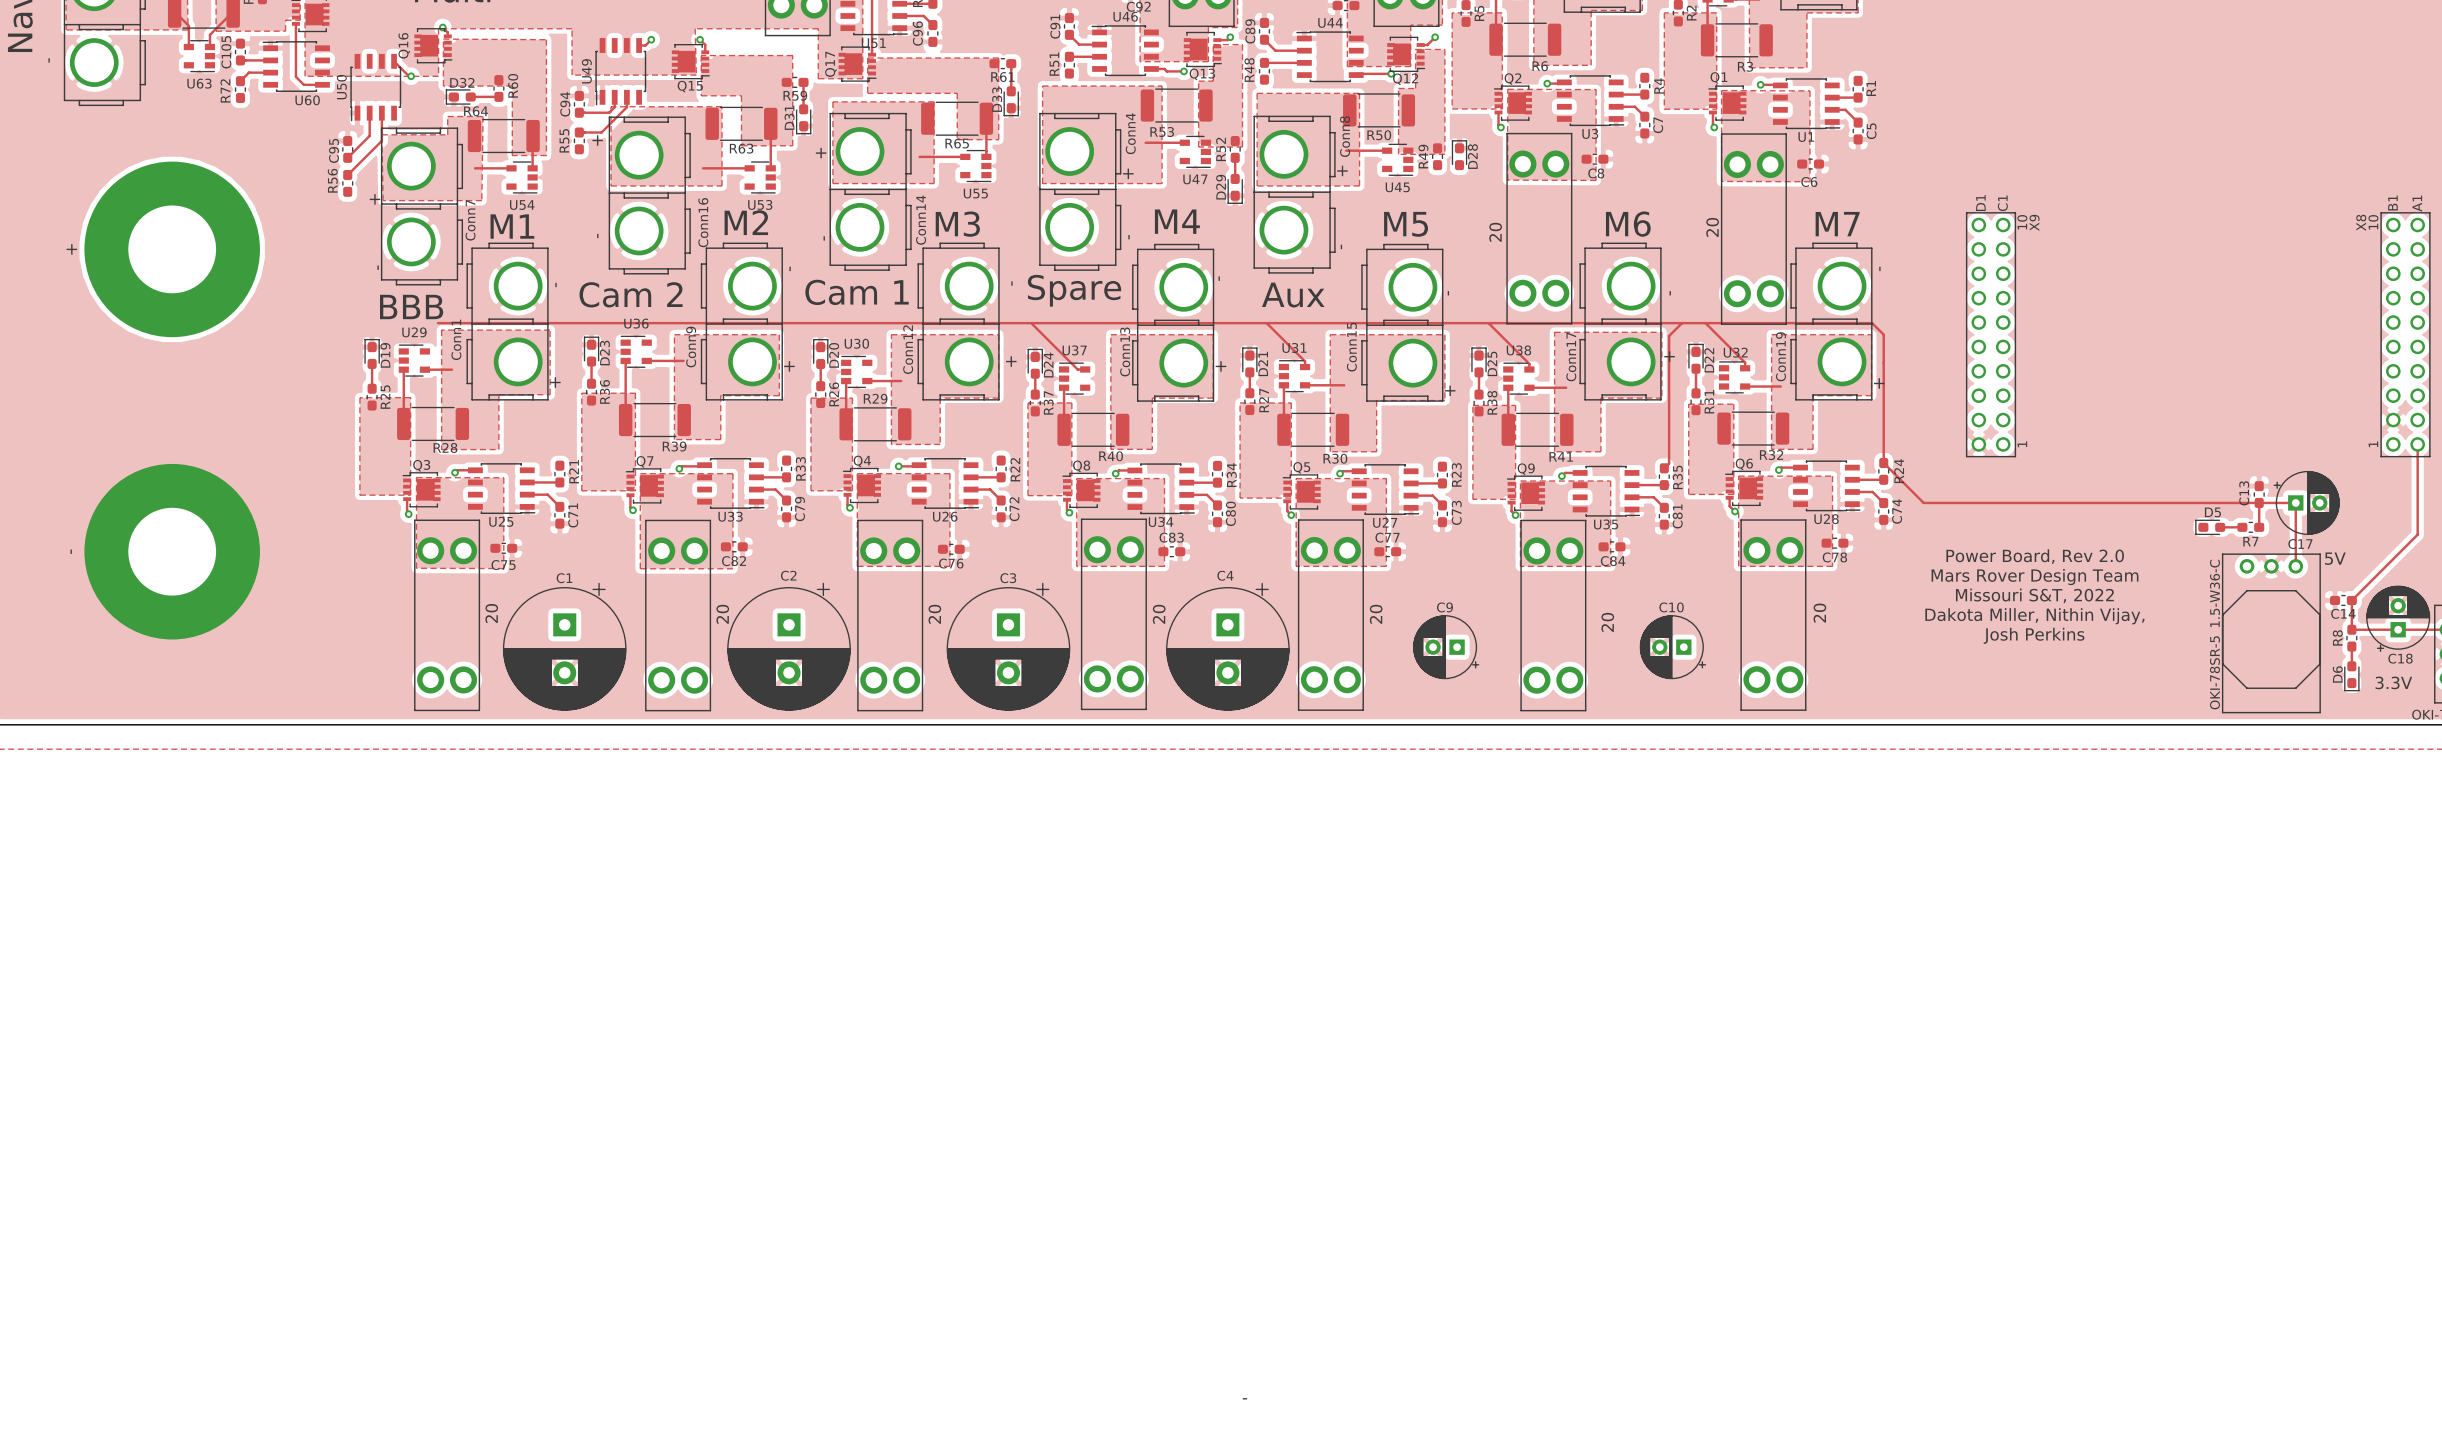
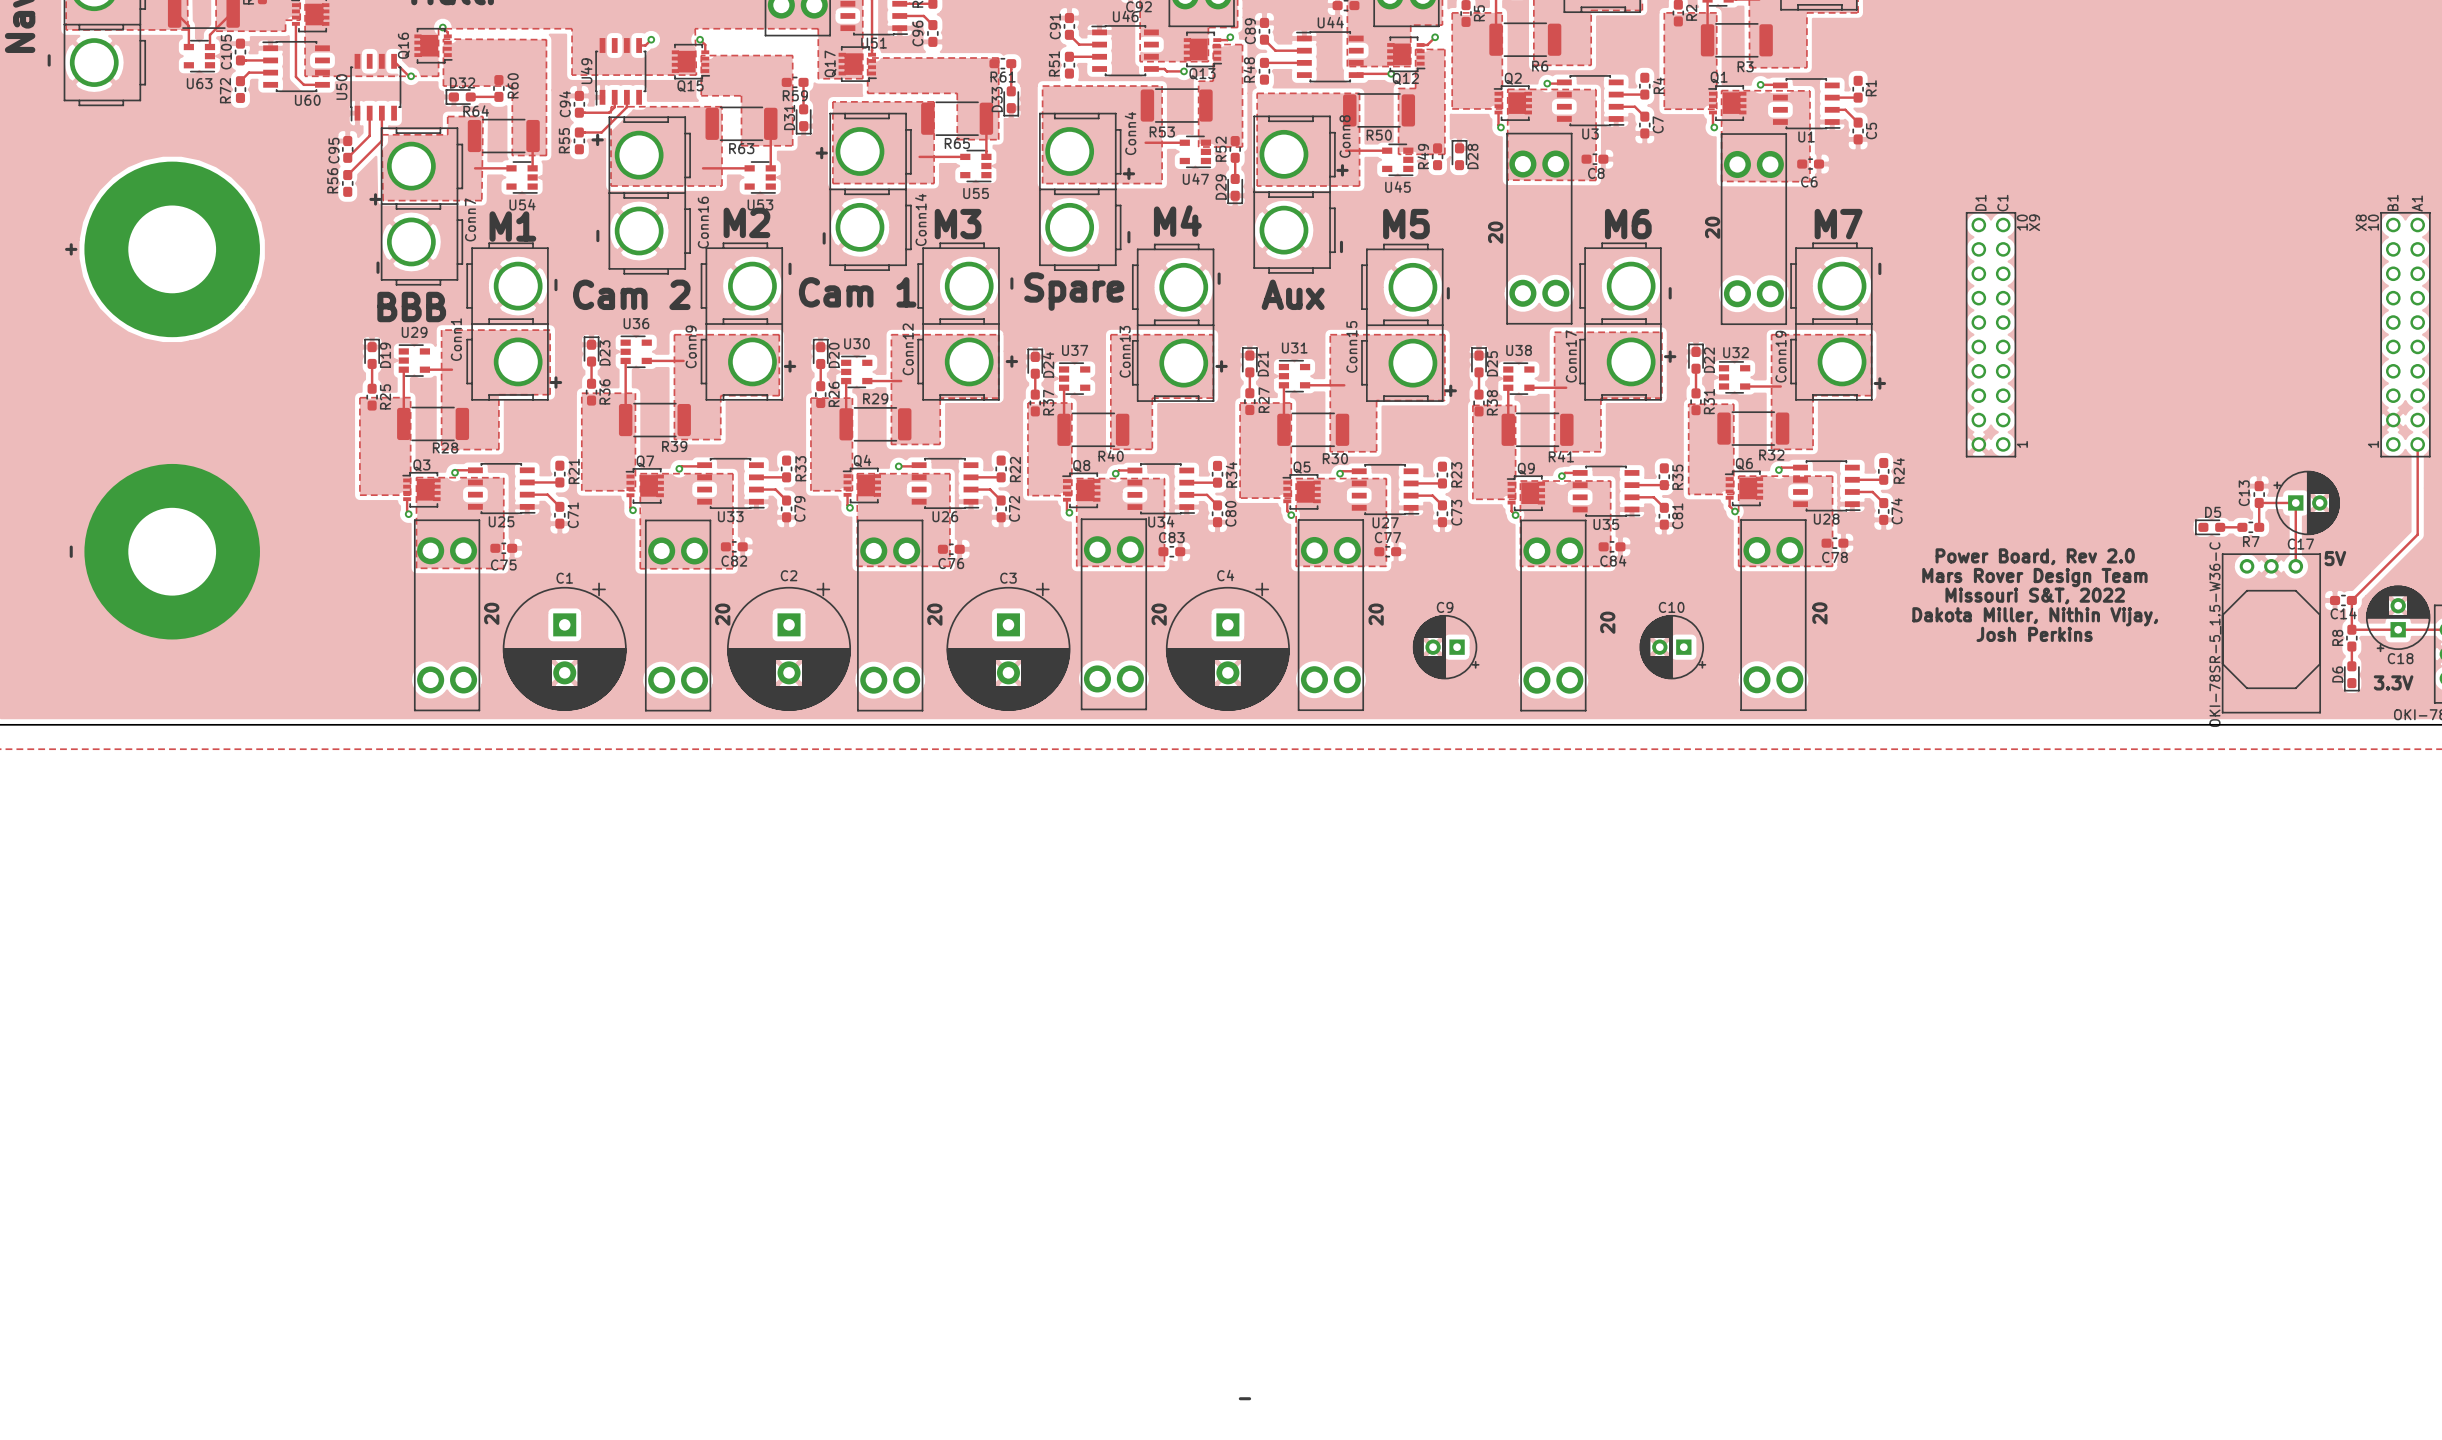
track: (437, 323) (1872, 323) (1883, 334) (1883, 462) (1923, 502) (2259, 502) -> none
track: (1032, 323) (1077, 369) (1085, 369) -> none
track: (1266, 323) (1305, 361) (1305, 367) -> none
track: (1488, 323) (1529, 363) (1529, 369) -> none
track: (1681, 323) (1669, 336) (1669, 463) (1664, 468) -> none
track: (1705, 323) (1745, 362) (1745, 368) -> none

